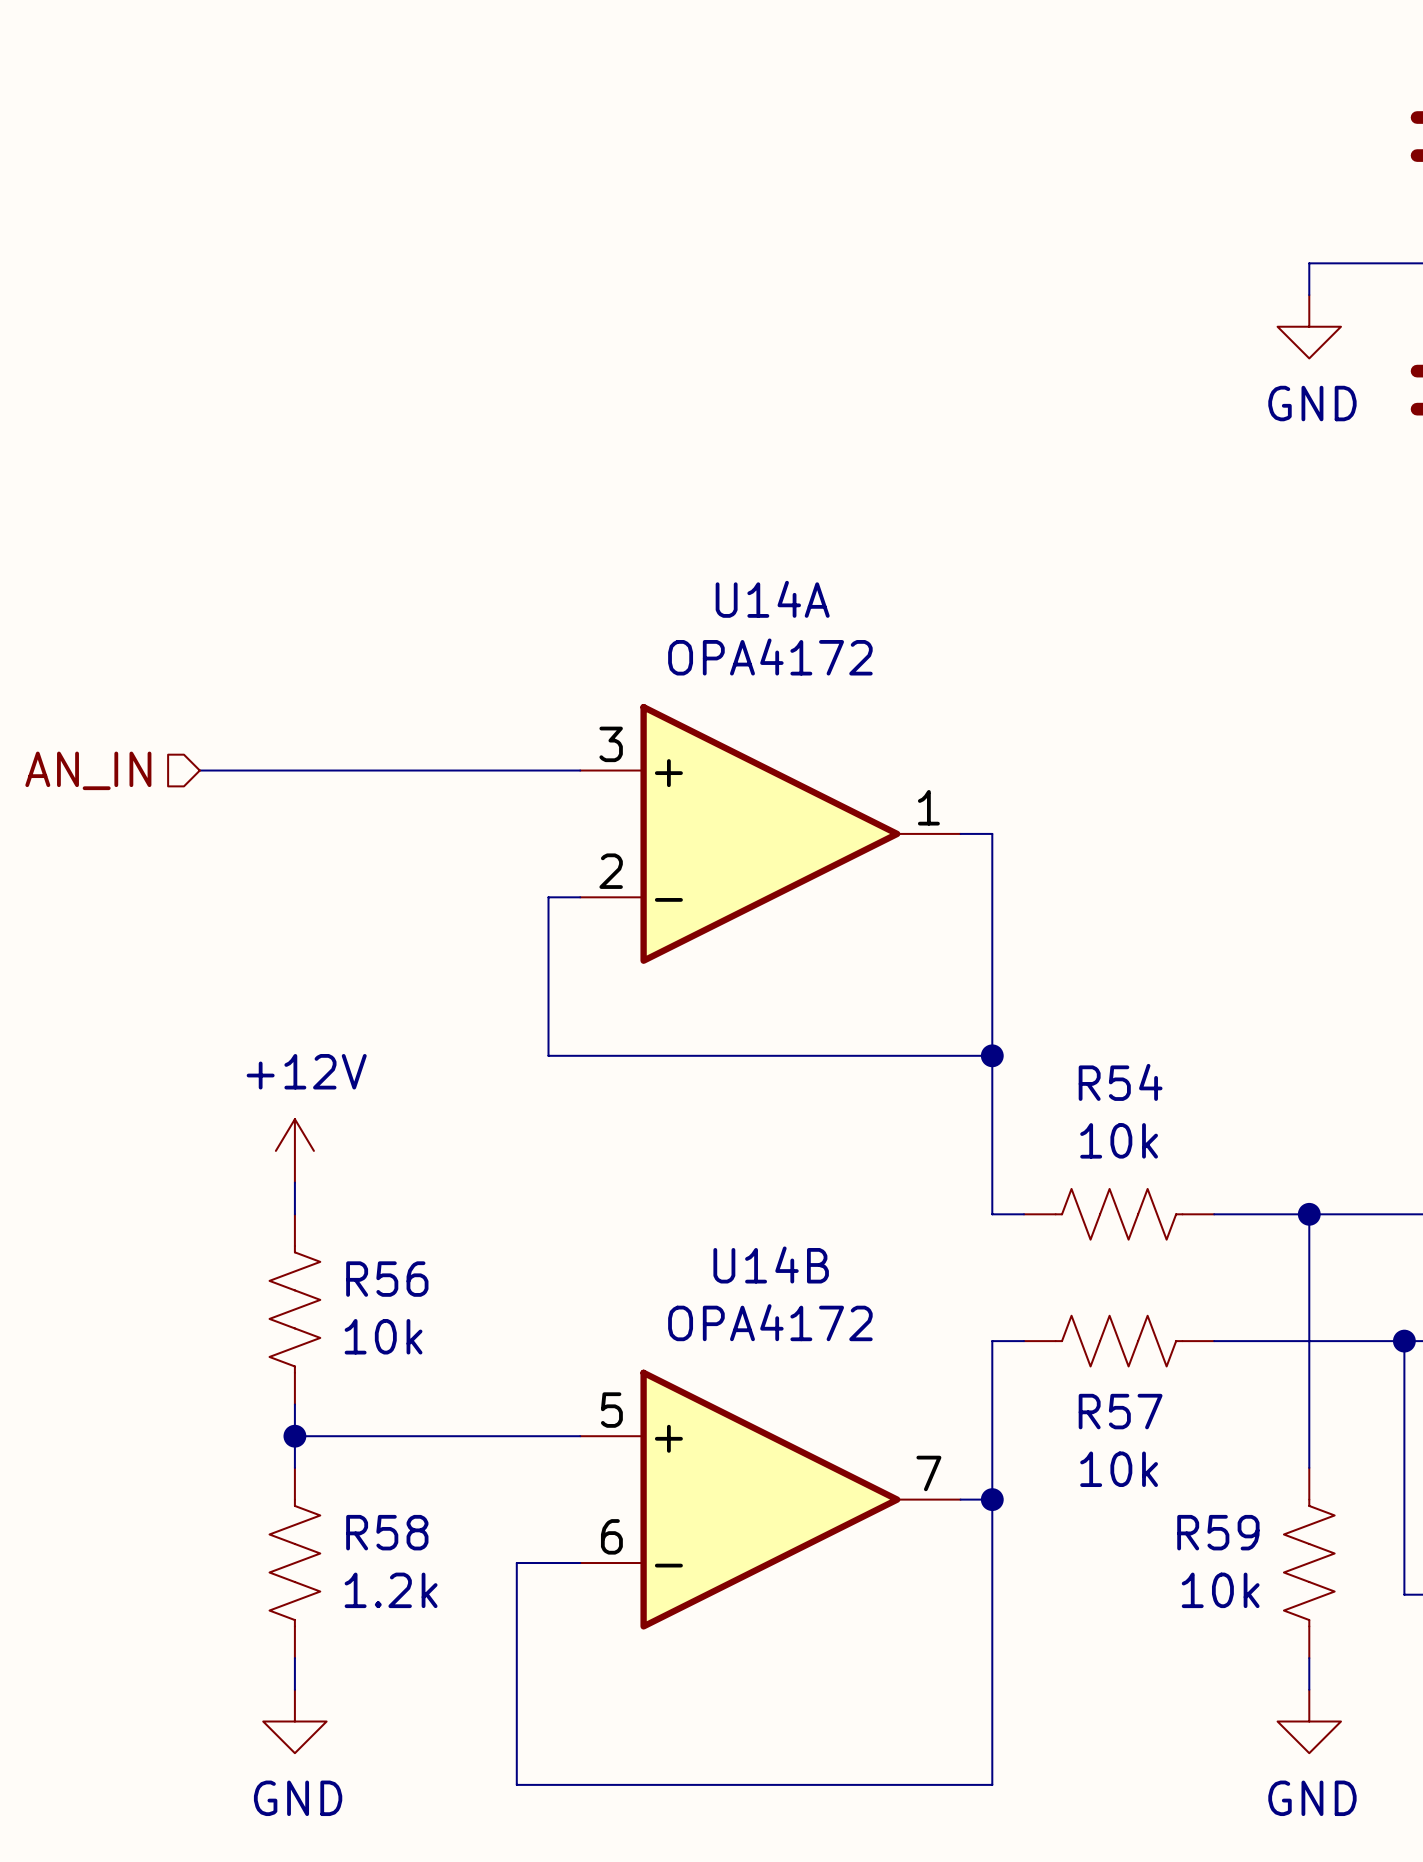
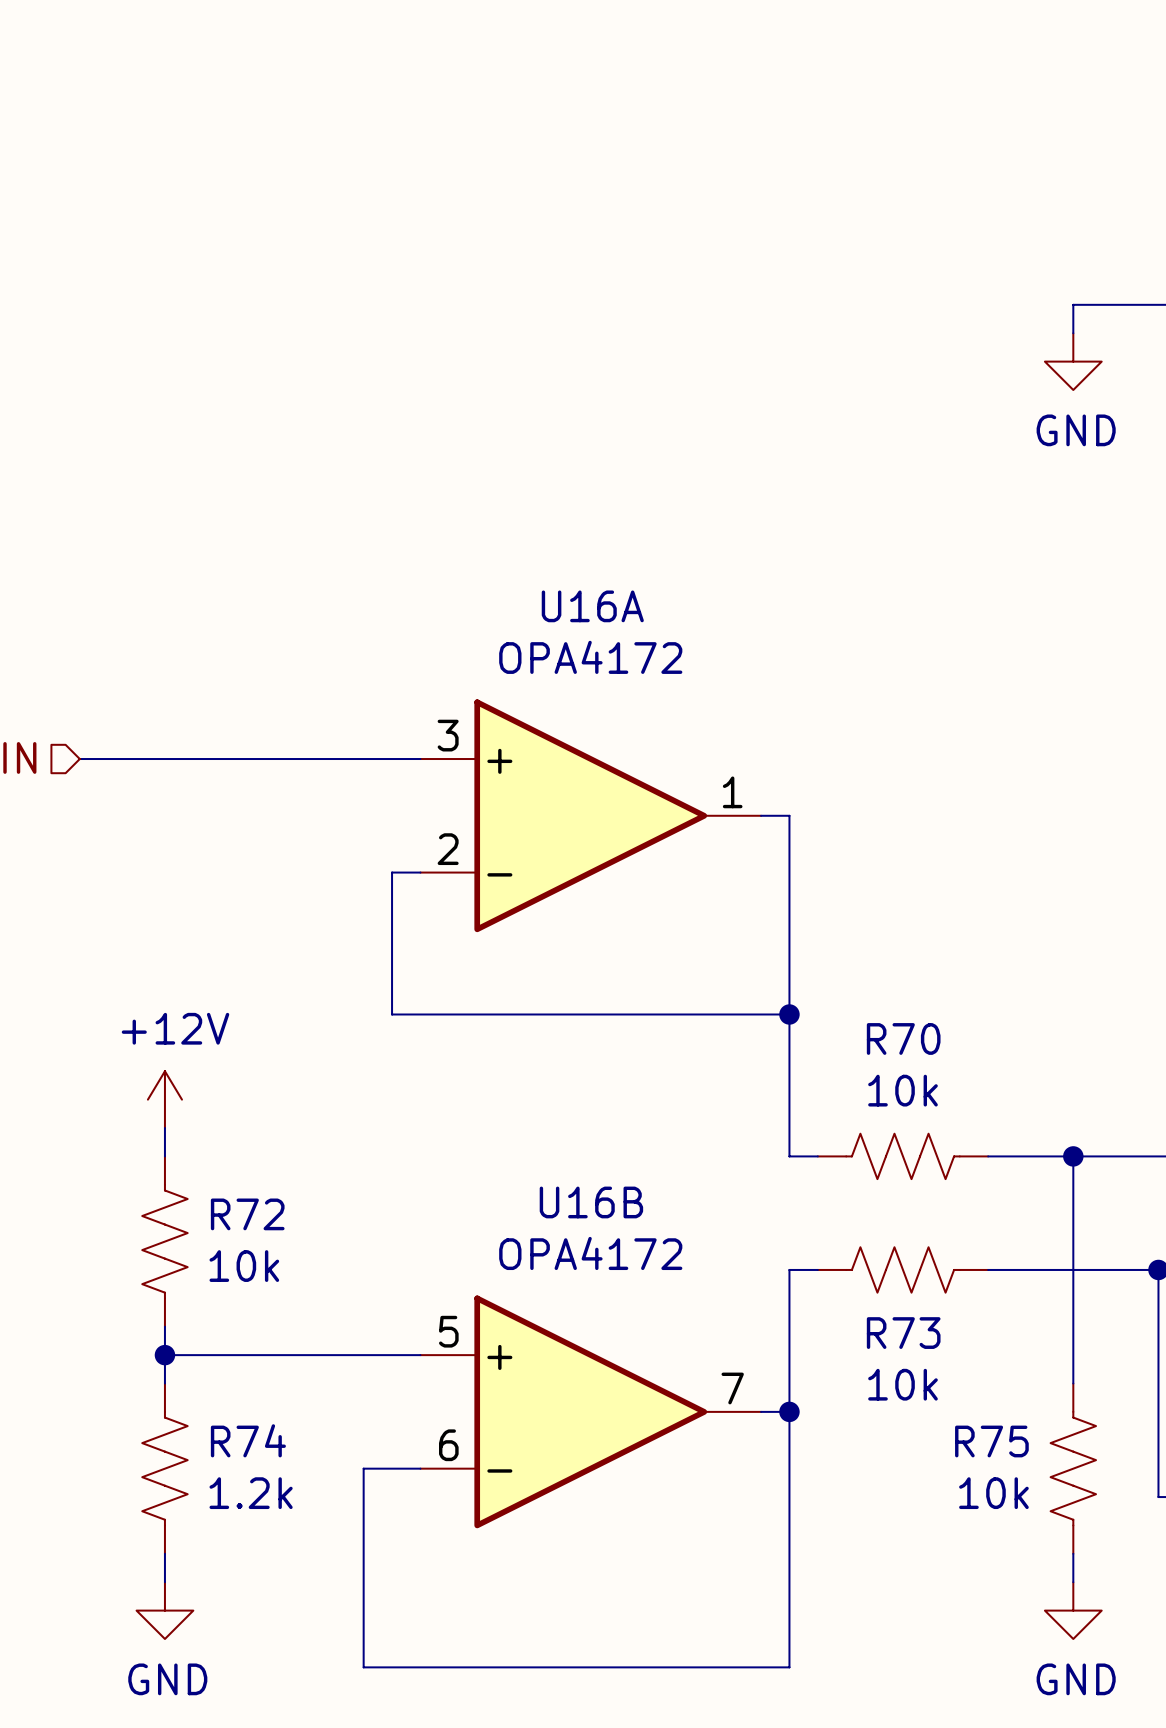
U14A name: U14A (772, 599) -> U16A (592, 606)
R54 name: R54 (1120, 1082) -> R70 (903, 1038)
U14B name: U14B (771, 1264) -> U16B (591, 1202)
R56 name: R56 (387, 1279) -> R72 (247, 1214)
R57 name: R57 (1120, 1411) -> R73 (903, 1333)
R58 name: R58 (387, 1532) -> R74 (248, 1440)
R59 name: R59 (1218, 1532) -> R75 (991, 1441)

